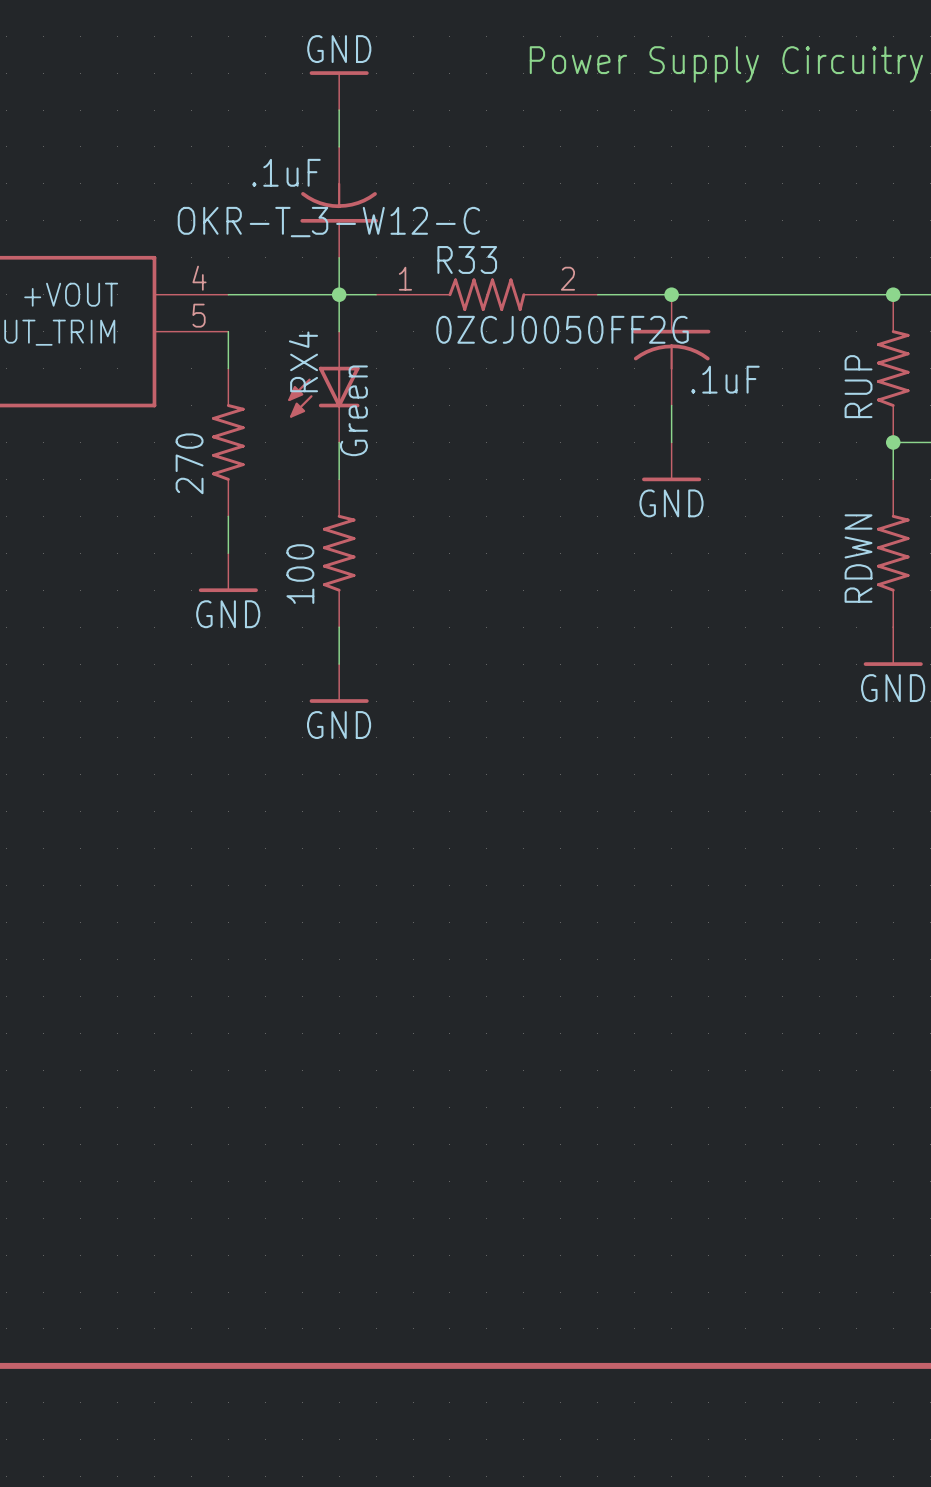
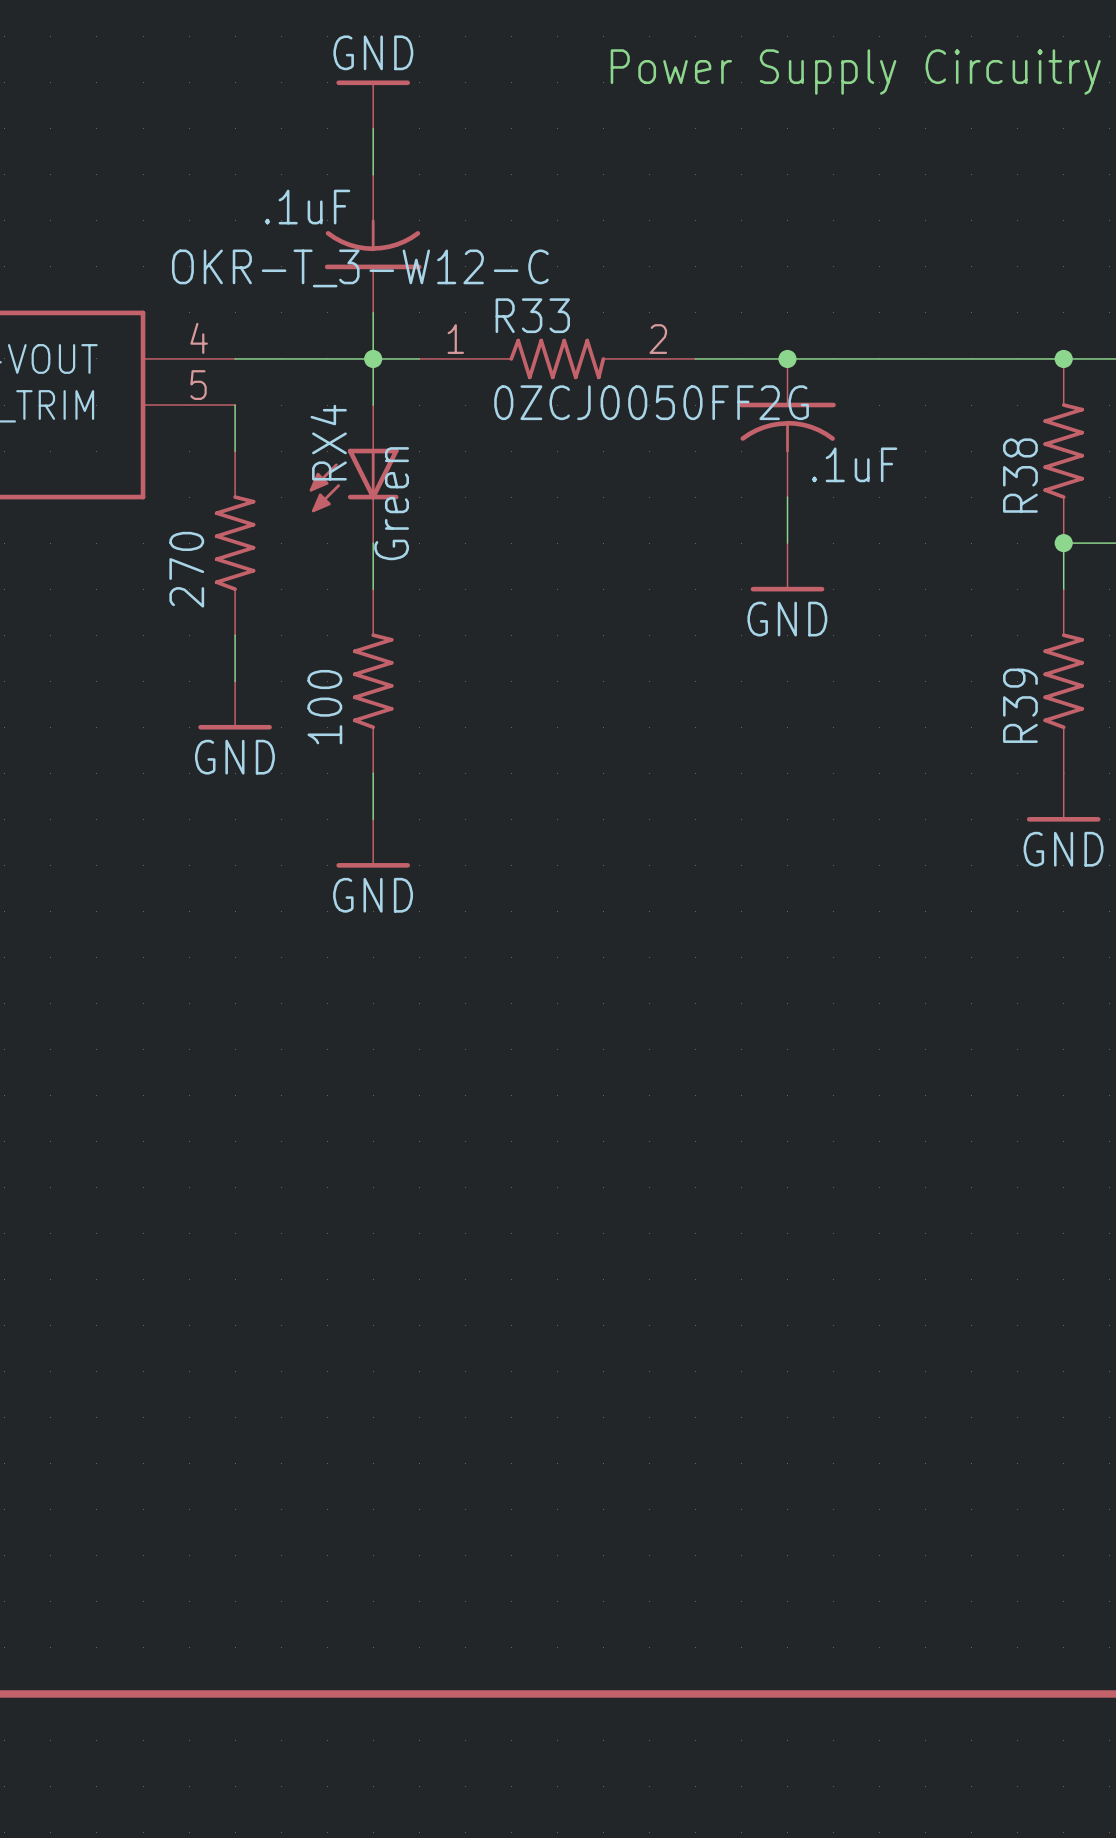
RUP name: RUP (858, 386) -> R38 (1020, 475)
RDWN name: RDWN (858, 558) -> R39 (1020, 705)

